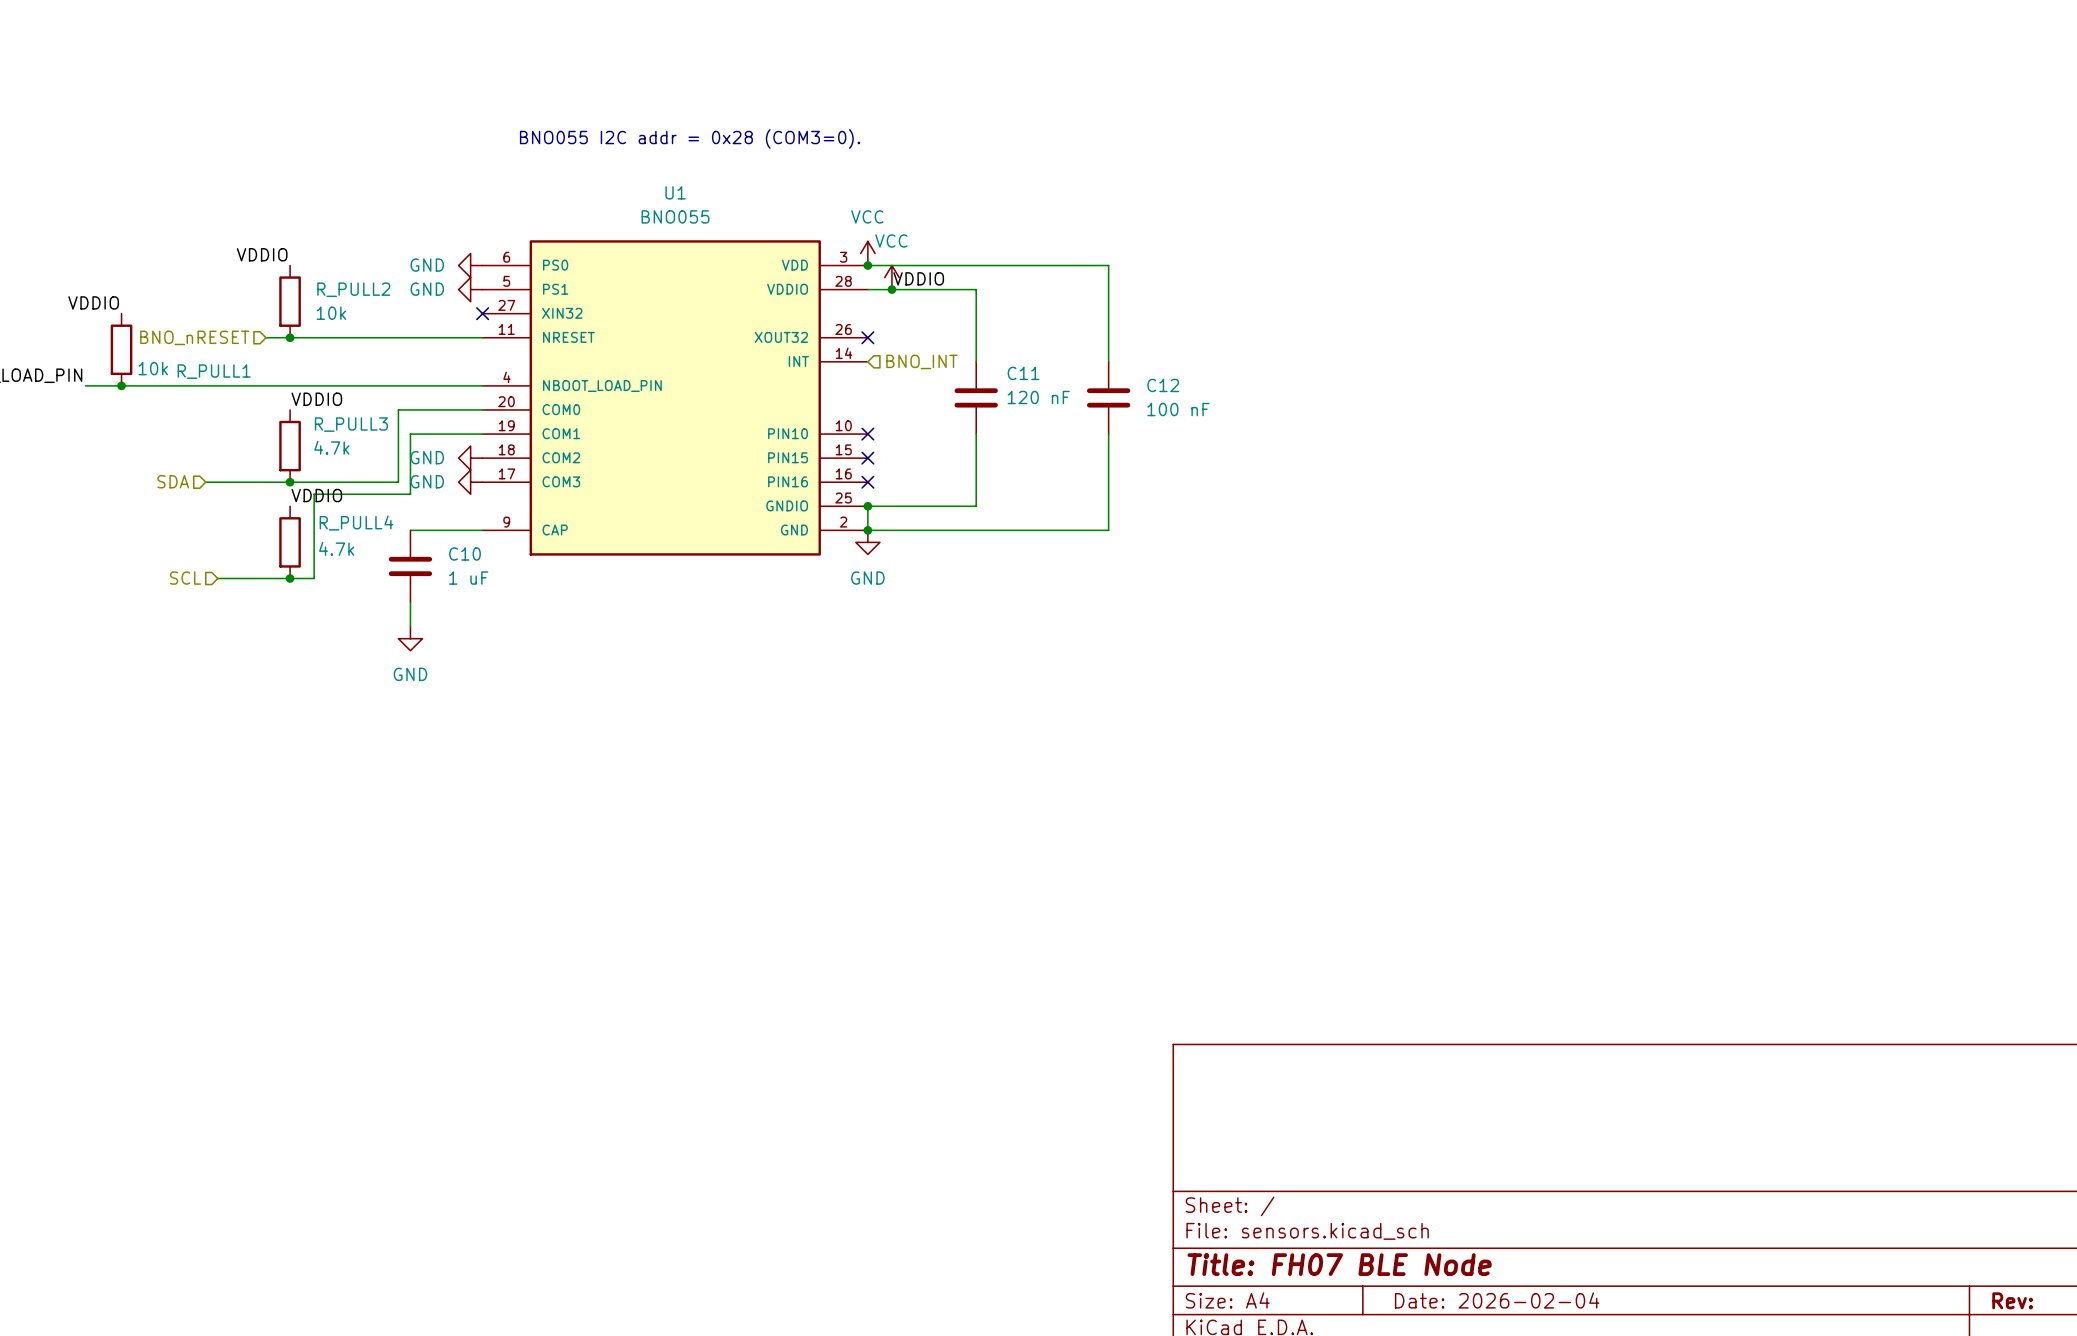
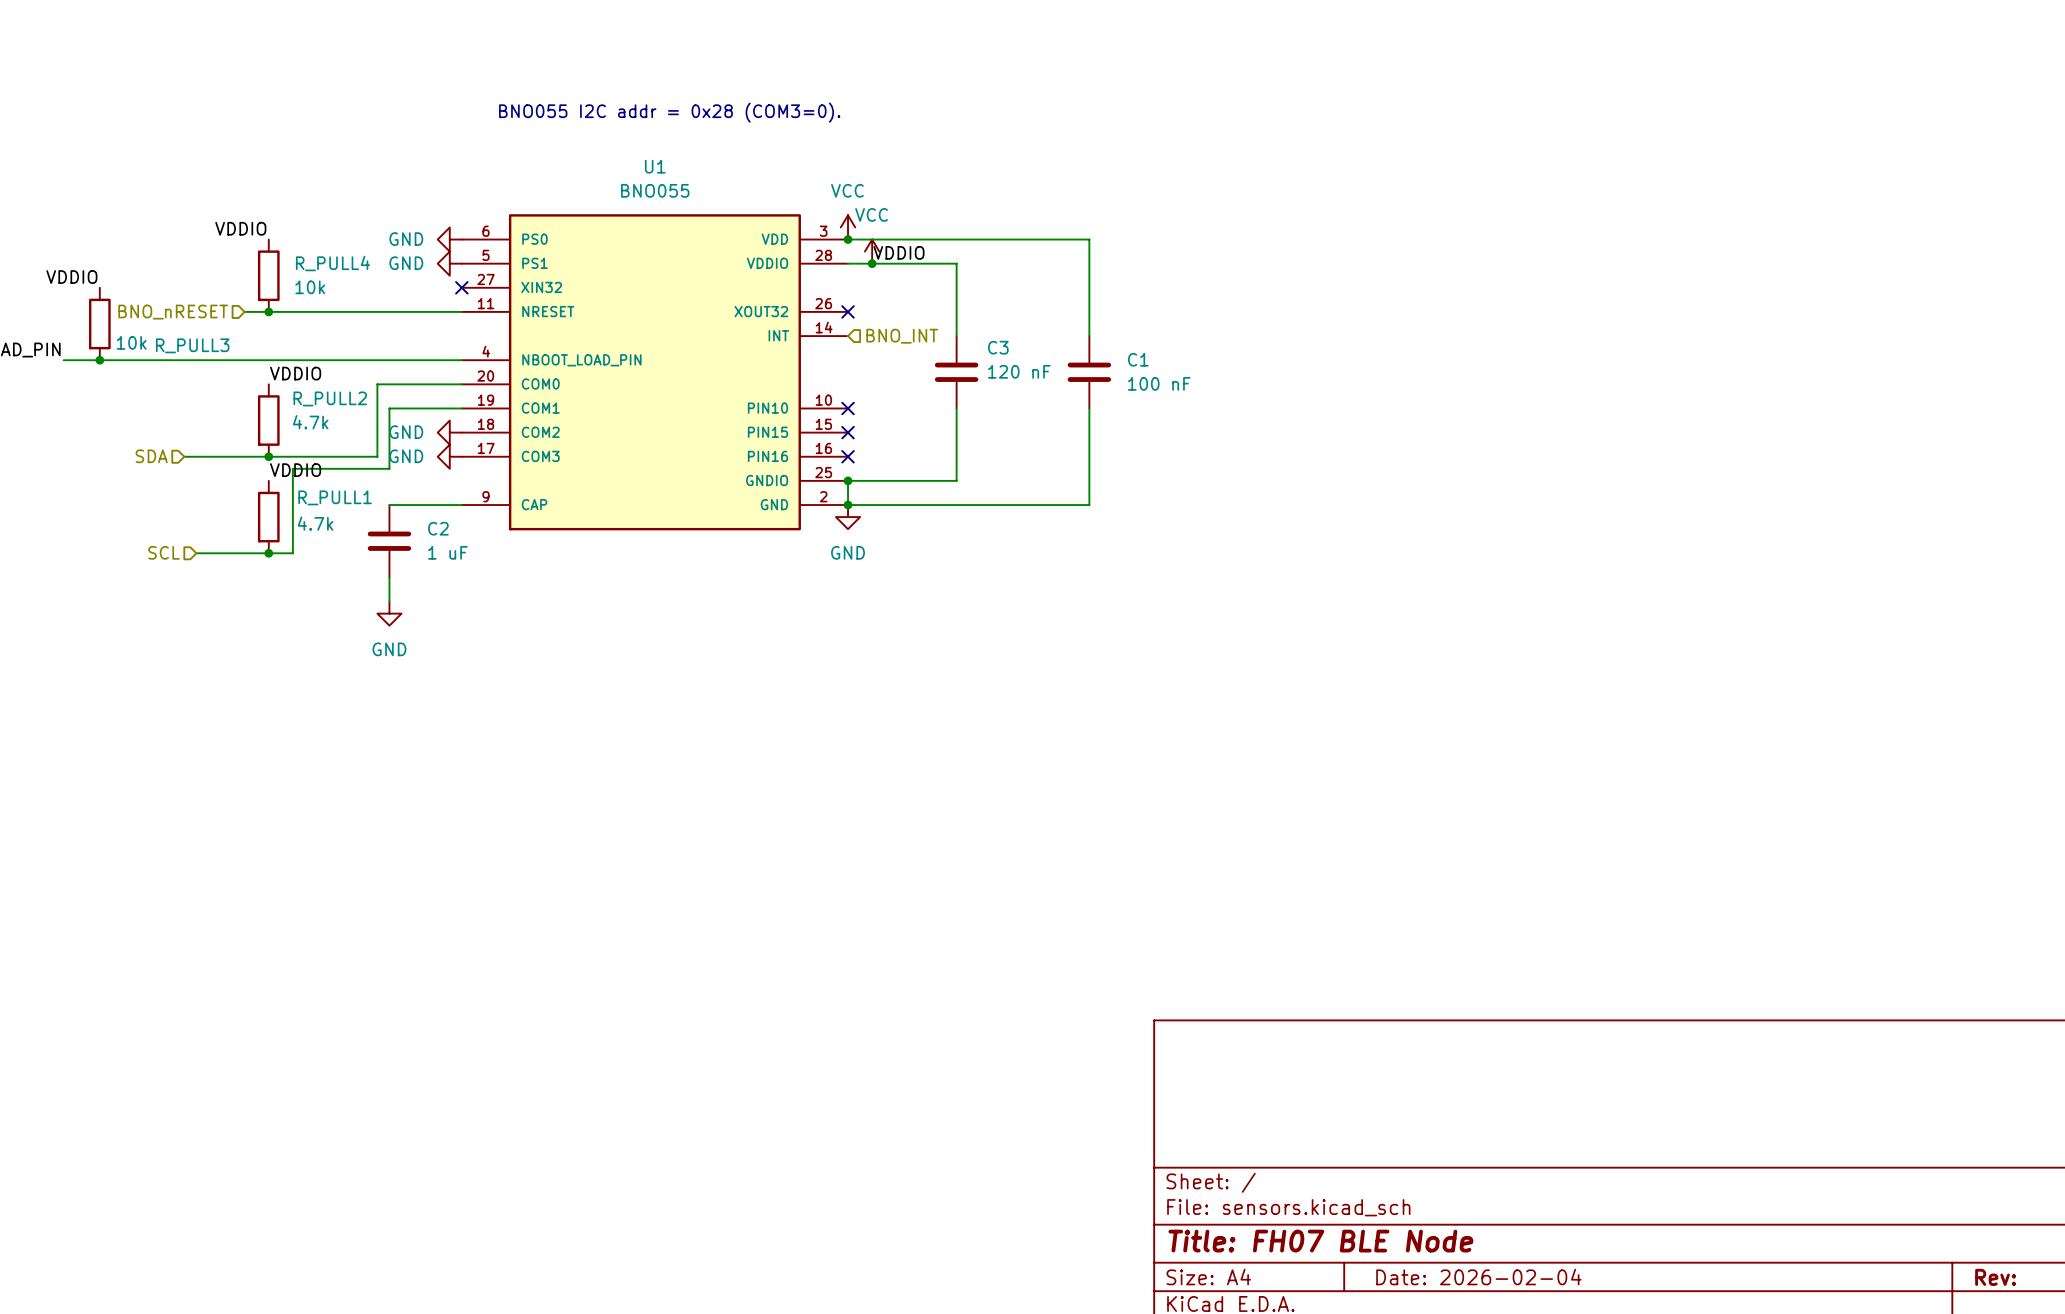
R_PULL2 name: R_PULL2 (353, 289) -> R_PULL4 (332, 263)
R_PULL1 name: R_PULL1 (214, 371) -> R_PULL3 (192, 345)
C11 name: C11 (1023, 373) -> C3 (998, 347)
C12 name: C12 (1163, 385) -> C1 (1138, 359)
R_PULL3 name: R_PULL3 (351, 424) -> R_PULL2 (330, 398)
R_PULL4 name: R_PULL4 (356, 522) -> R_PULL1 (335, 497)
C10 name: C10 (464, 553) -> C2 (438, 528)

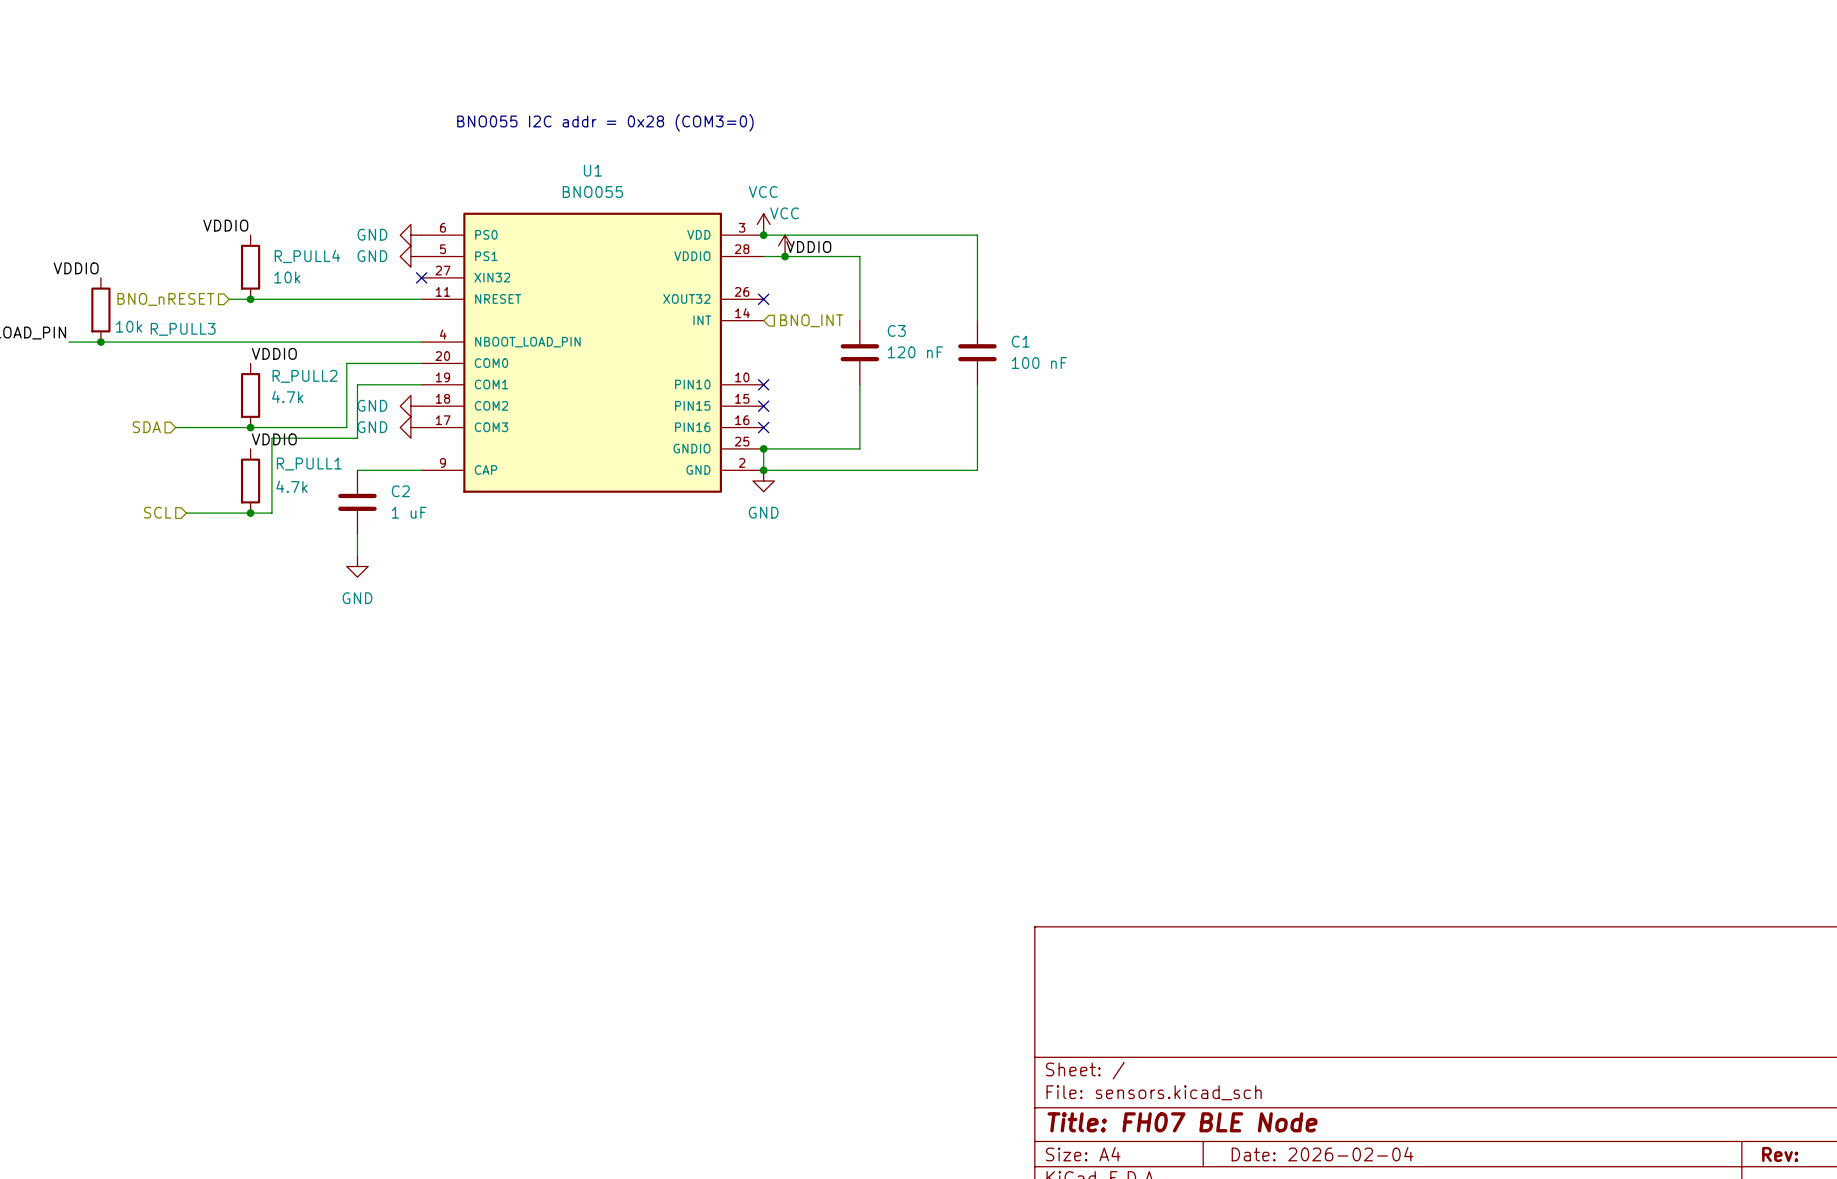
text: BNO055 I2C addr = 0x28 (COM3=0). (669, 112) -> BNO055 I2C addr = 0x28 (COM3=0) (605, 122)

